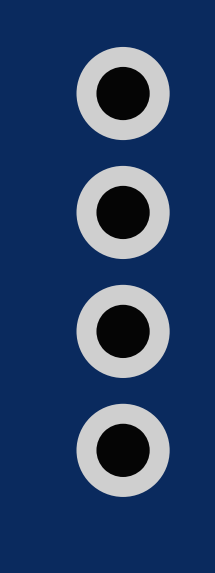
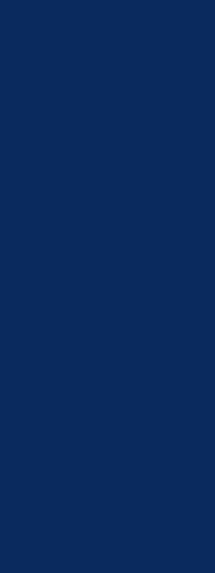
part: (123, 93) -> none
part: (123, 212) -> none
part: (123, 331) -> none
part: (123, 450) -> none

